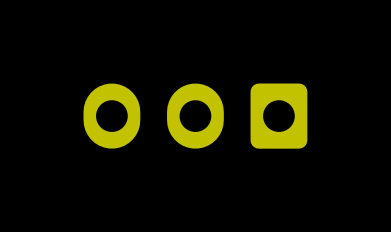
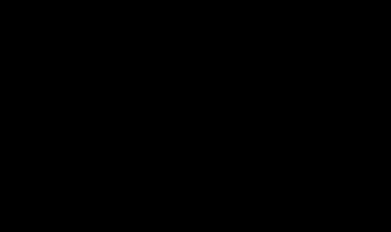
part: (195, 116) -> none

